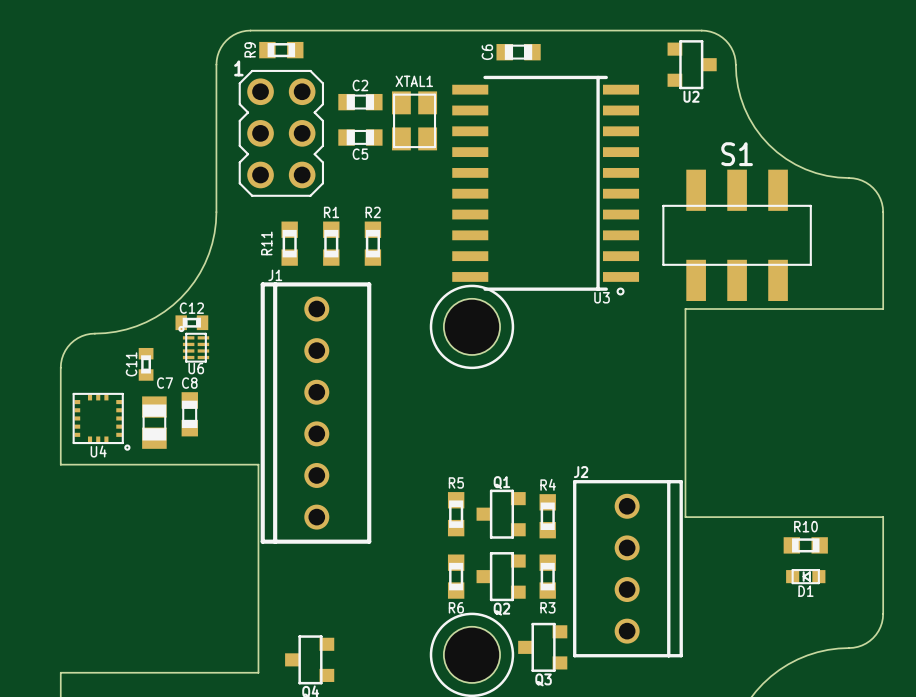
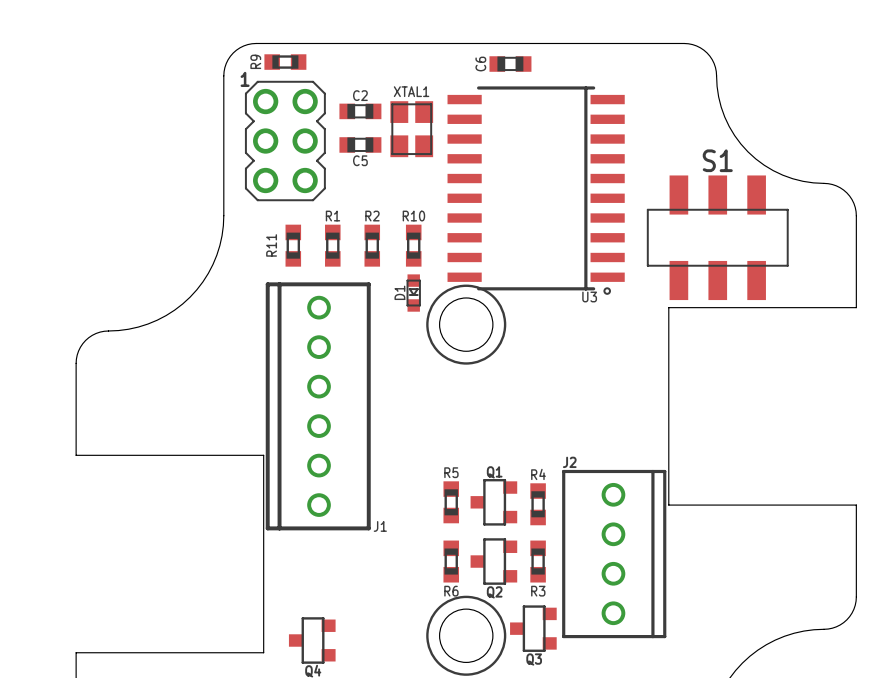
U2: (692, 64) -> none
J1 name position: J1 (275, 275) -> J1 (380, 526)
C12: (191, 322) -> none
U6: (193, 344) -> none
C11: (146, 364) -> none
C8: (189, 414) -> none
U4: (101, 421) -> none
C7: (154, 422) -> none
R10 rotation: 0° (805, 545) -> 90° clockwise (413, 245)
R10 position: (805, 545) -> (413, 245)
D1 rotation: 0° (805, 576) -> 90° counterclockwise (413, 293)
D1 position: (805, 576) -> (413, 293)

